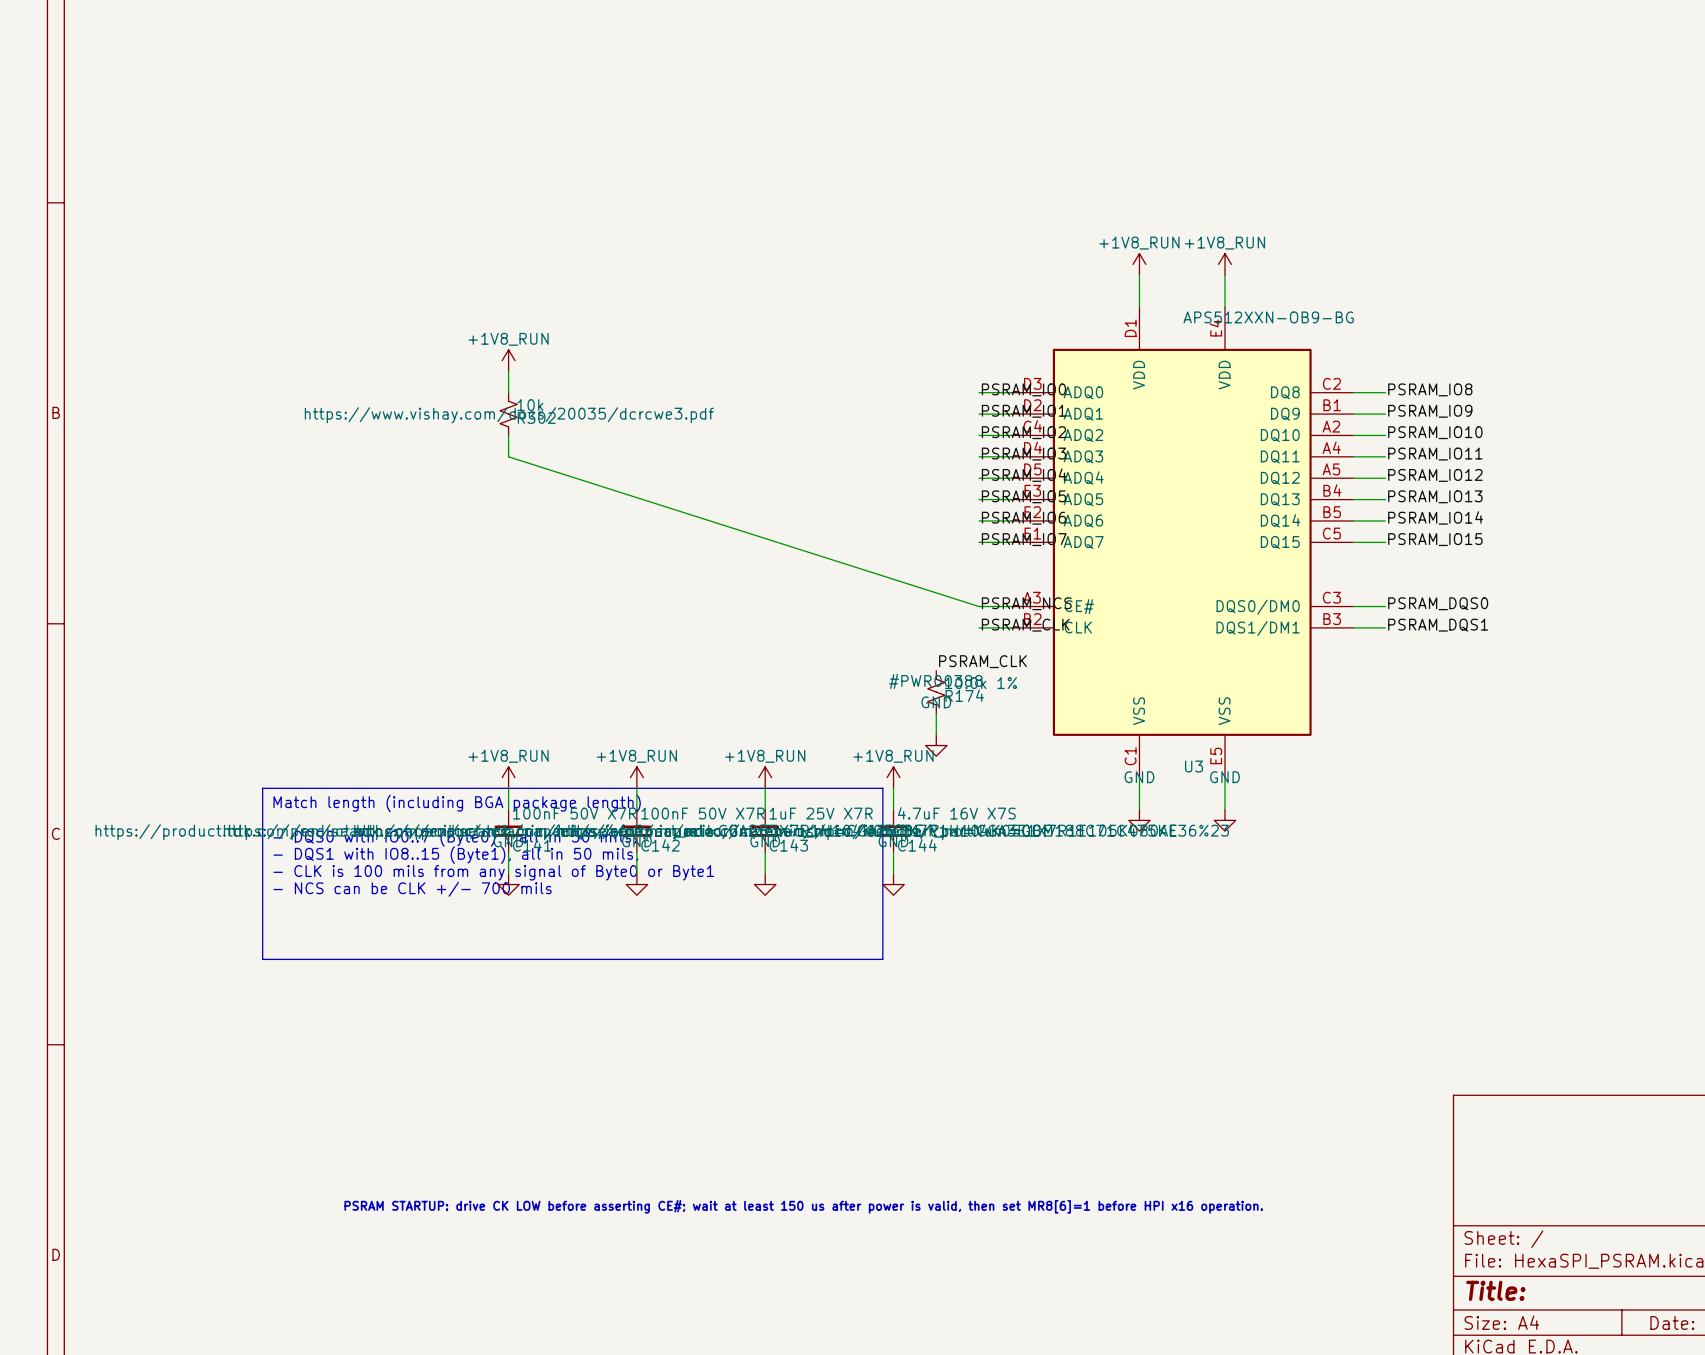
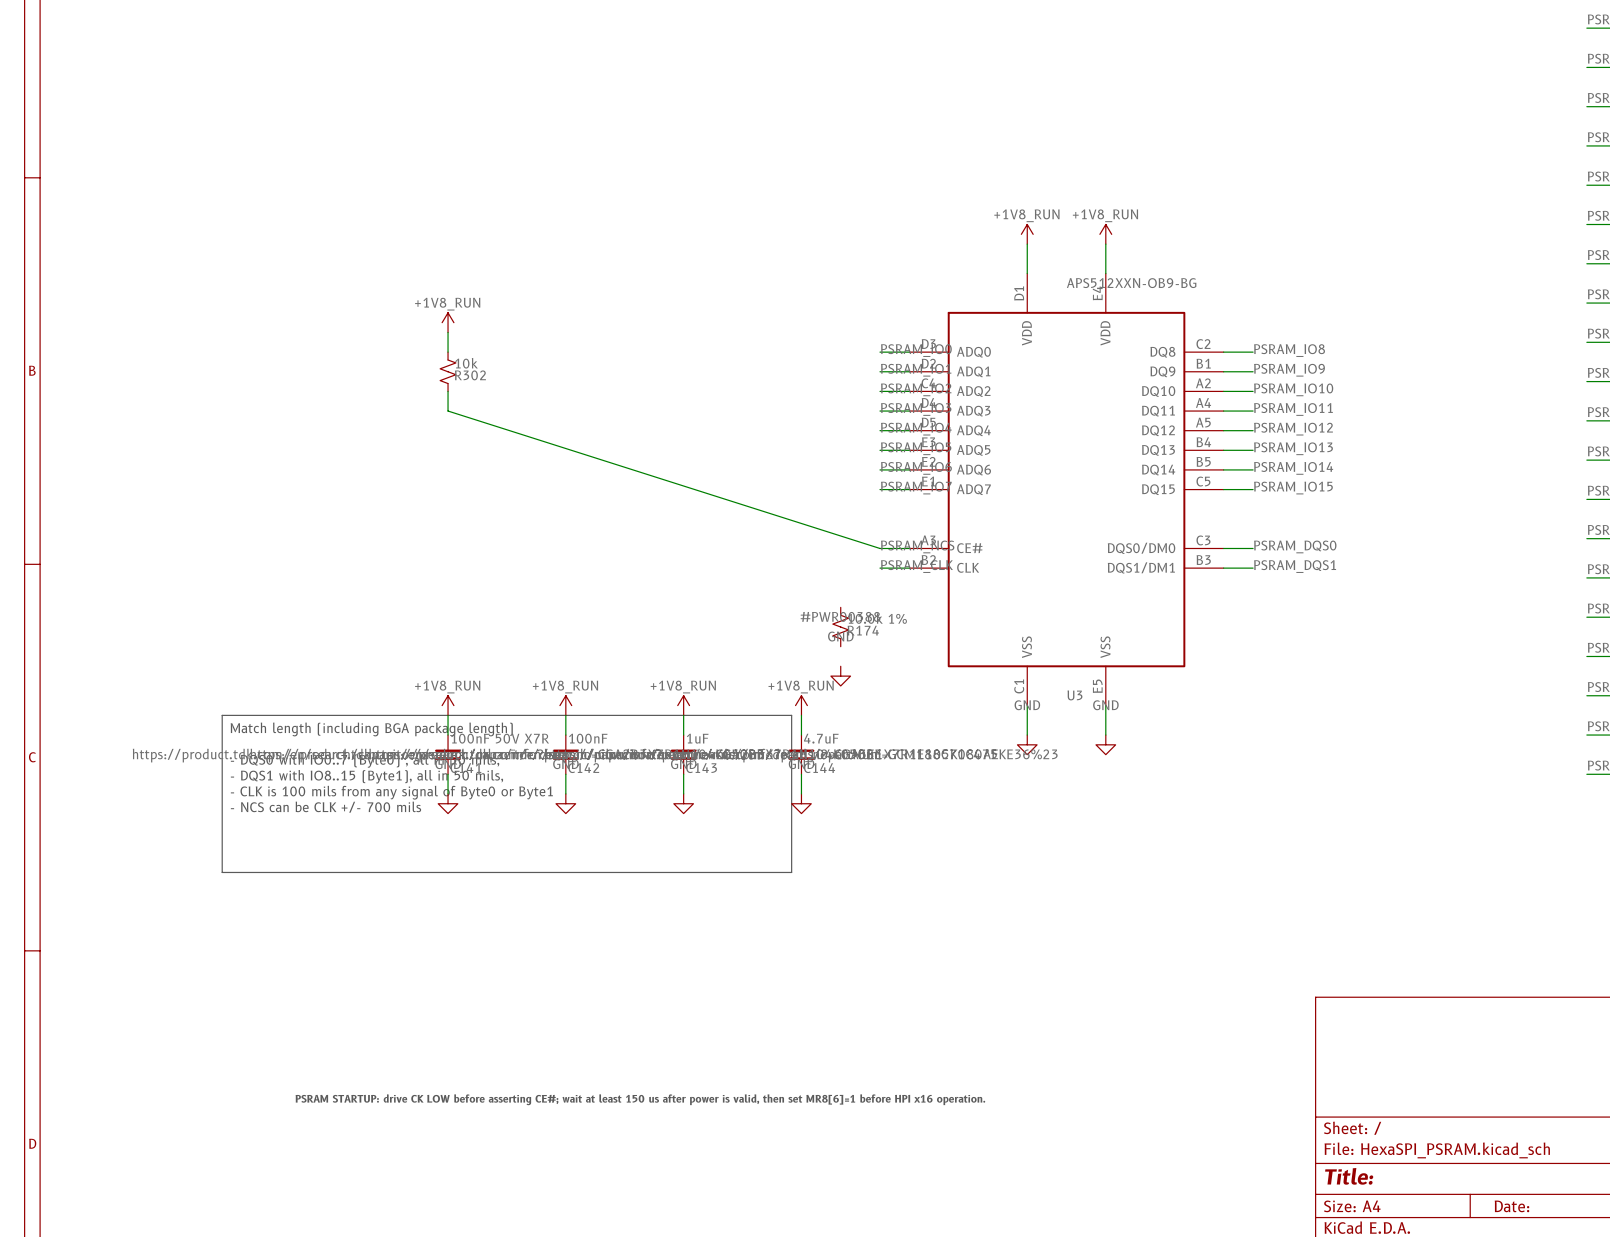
R302 text: https://www.vishay.com/docs/20035/dcrcwe3.pdf (509, 415) -> none
label: PSRAM_CLK (982, 661) -> none
wire: (936, 713) (936, 734) -> none
C142 value: 100nF 50V X7R (703, 813) -> 100nF (588, 738)
C143 value: 1uF 25V X7R (821, 813) -> 1uF (697, 738)
C144 value: 4.7uF 16V X7S (956, 813) -> 4.7uF (821, 738)

